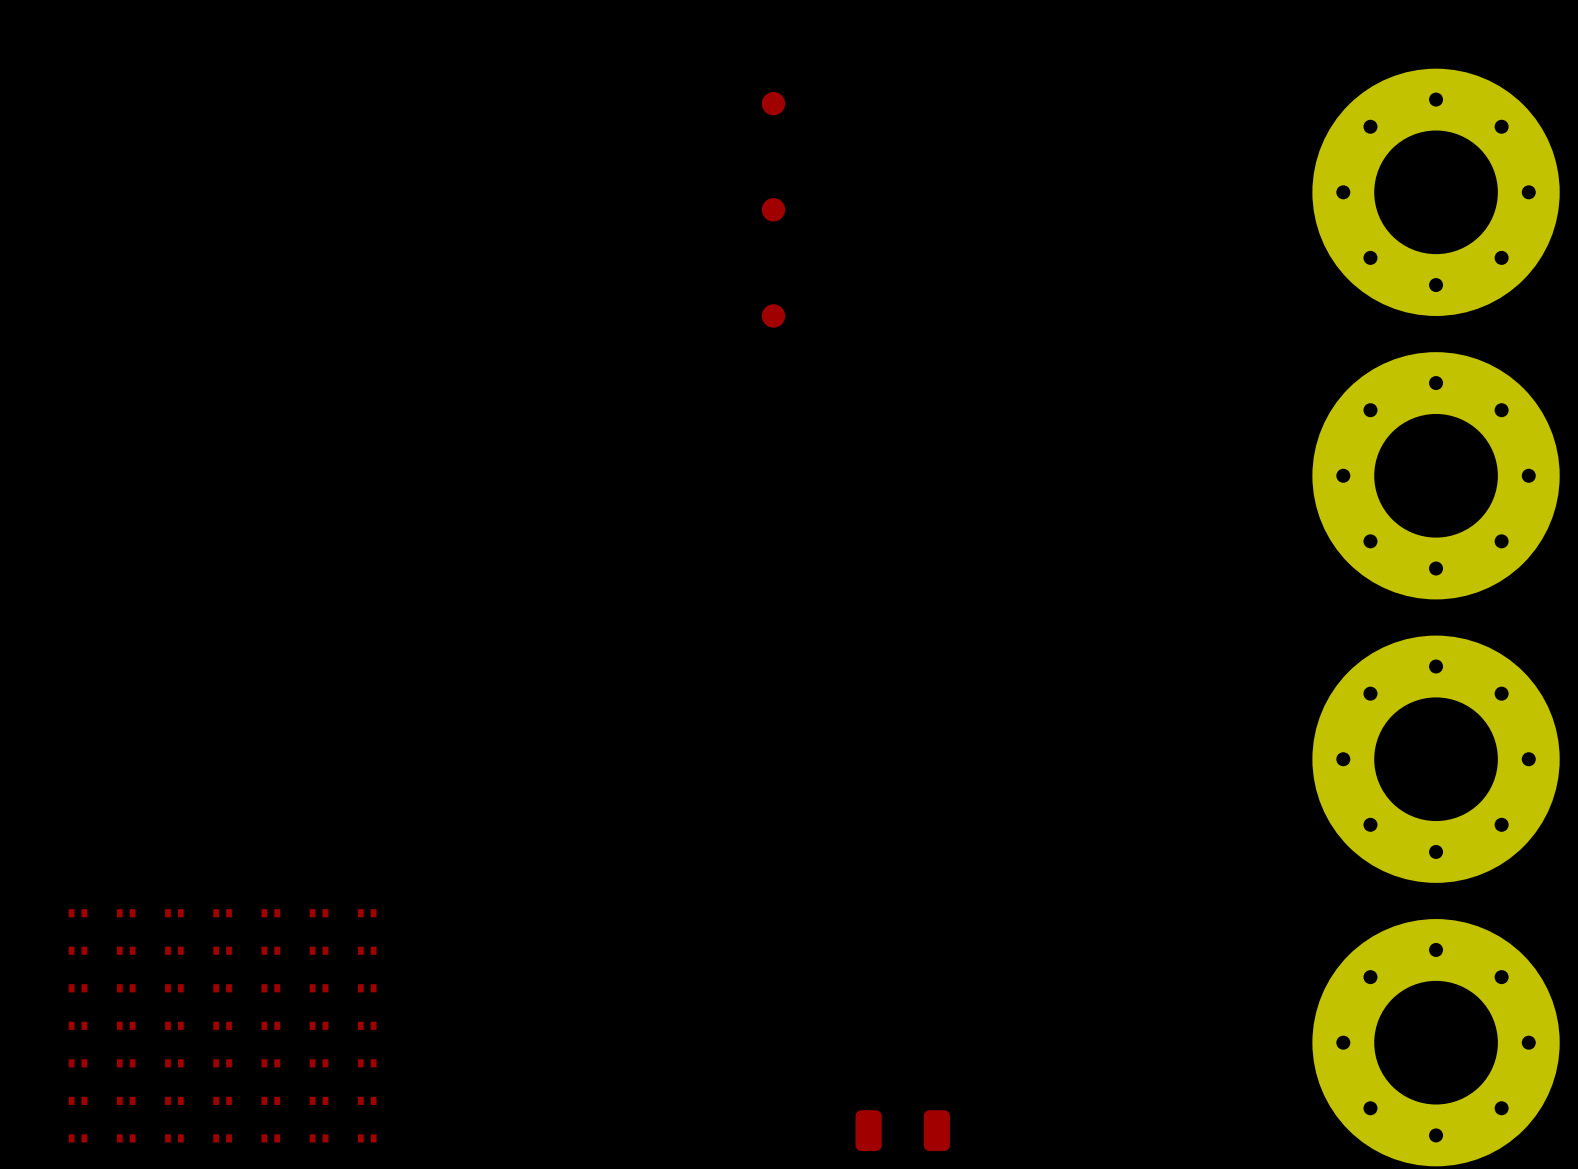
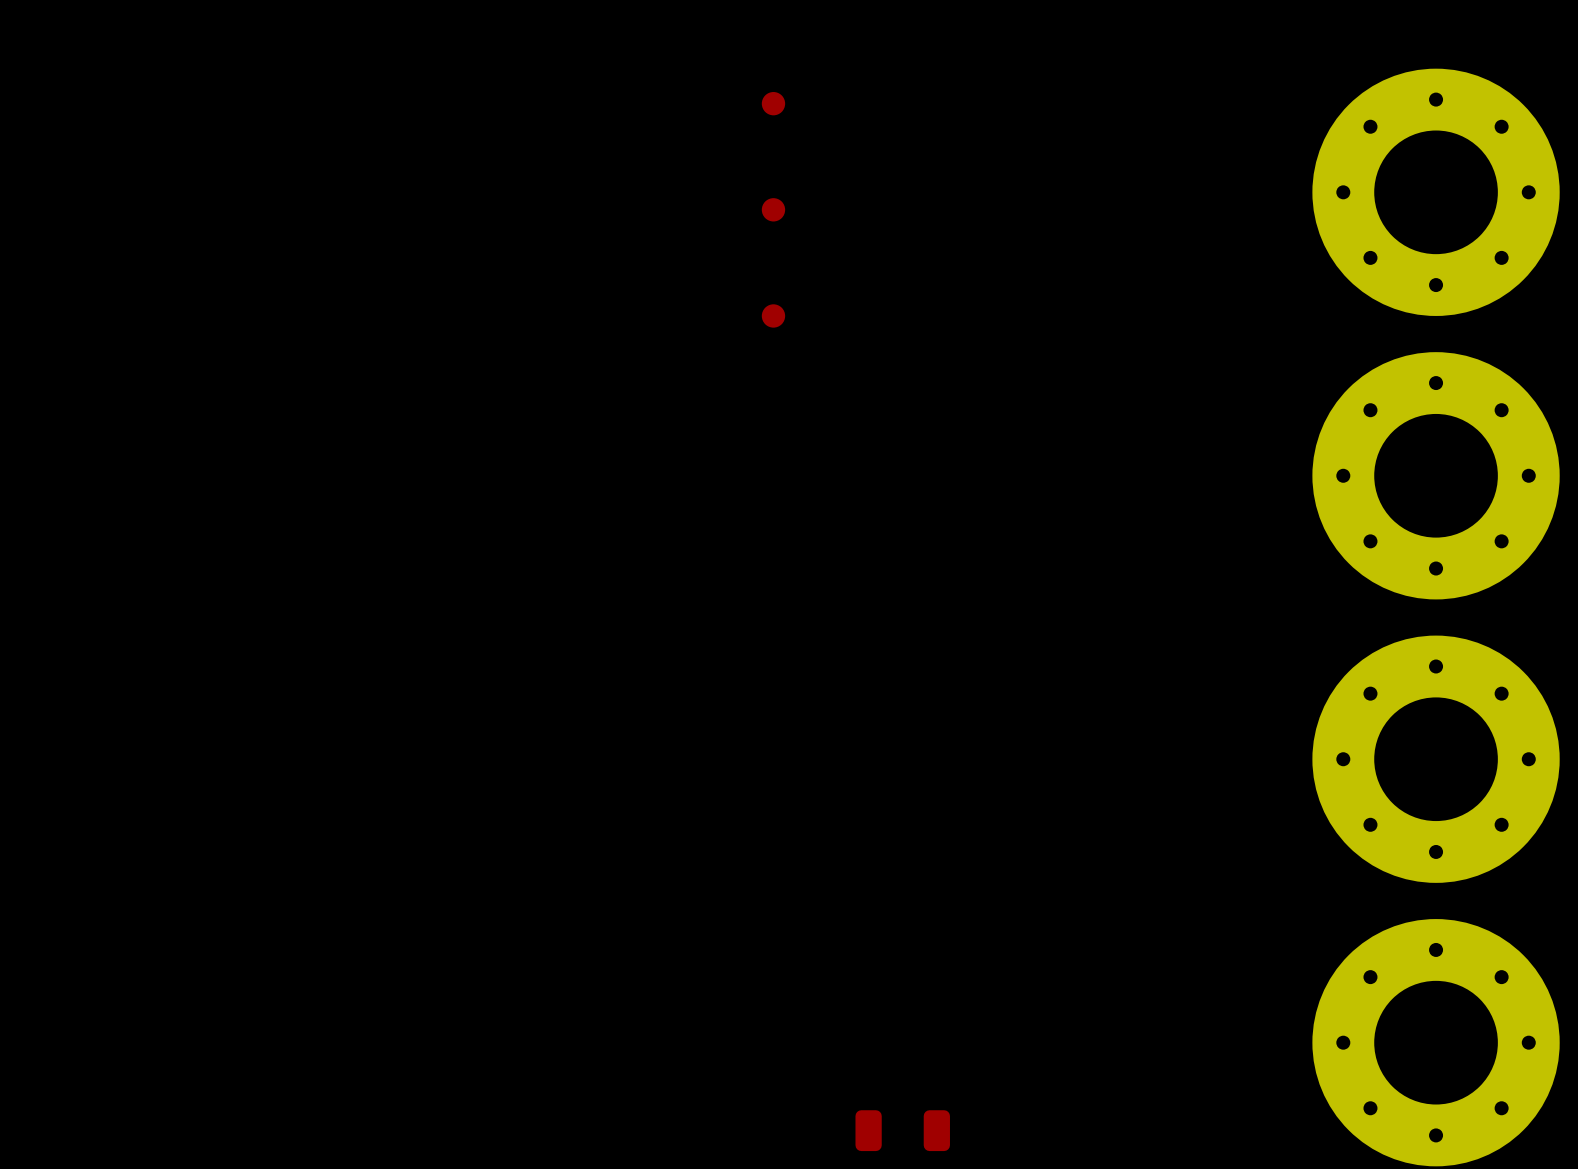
part: (78, 913) -> none
part: (126, 913) -> none
part: (174, 913) -> none
part: (222, 913) -> none
part: (270, 913) -> none
part: (319, 913) -> none
part: (367, 913) -> none
part: (78, 950) -> none
part: (126, 950) -> none
part: (174, 950) -> none
part: (222, 950) -> none
part: (270, 950) -> none
part: (319, 950) -> none
part: (367, 950) -> none
part: (78, 988) -> none
part: (126, 988) -> none
part: (174, 988) -> none
part: (222, 988) -> none
part: (270, 988) -> none
part: (319, 988) -> none
part: (367, 988) -> none
part: (78, 1025) -> none
part: (126, 1025) -> none
part: (174, 1025) -> none
part: (222, 1025) -> none
part: (270, 1025) -> none
part: (319, 1025) -> none
part: (367, 1025) -> none
part: (78, 1063) -> none
part: (126, 1063) -> none
part: (174, 1063) -> none
part: (222, 1063) -> none
part: (270, 1063) -> none
part: (319, 1063) -> none
part: (367, 1063) -> none
part: (78, 1100) -> none
part: (126, 1100) -> none
part: (174, 1100) -> none
part: (222, 1100) -> none
part: (270, 1100) -> none
part: (319, 1100) -> none
part: (367, 1100) -> none
part: (78, 1138) -> none
part: (126, 1138) -> none
part: (174, 1138) -> none
part: (222, 1138) -> none
part: (270, 1138) -> none
part: (319, 1138) -> none
part: (367, 1138) -> none

